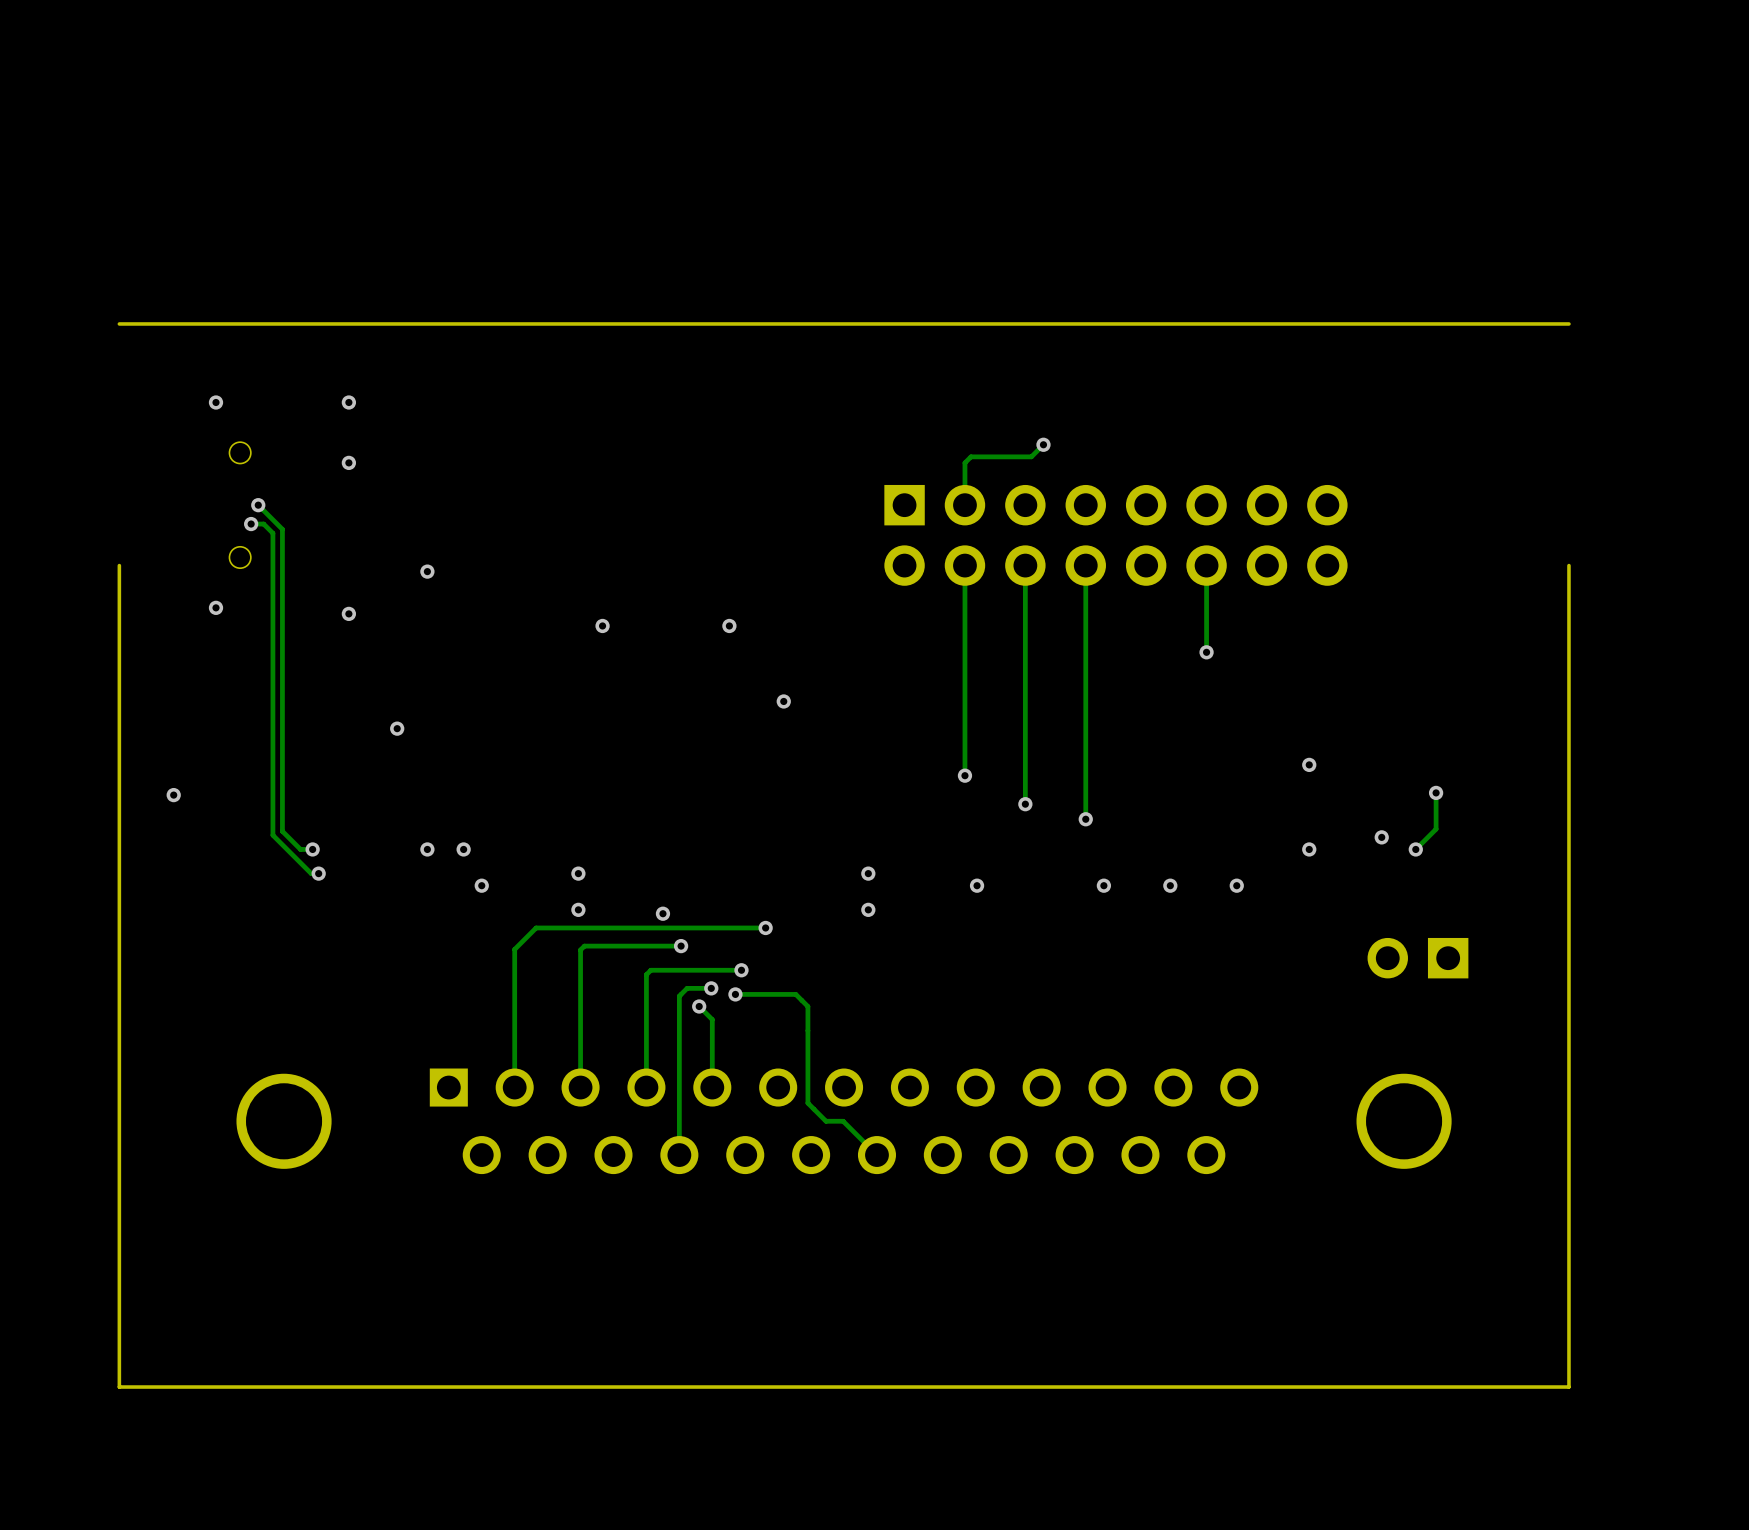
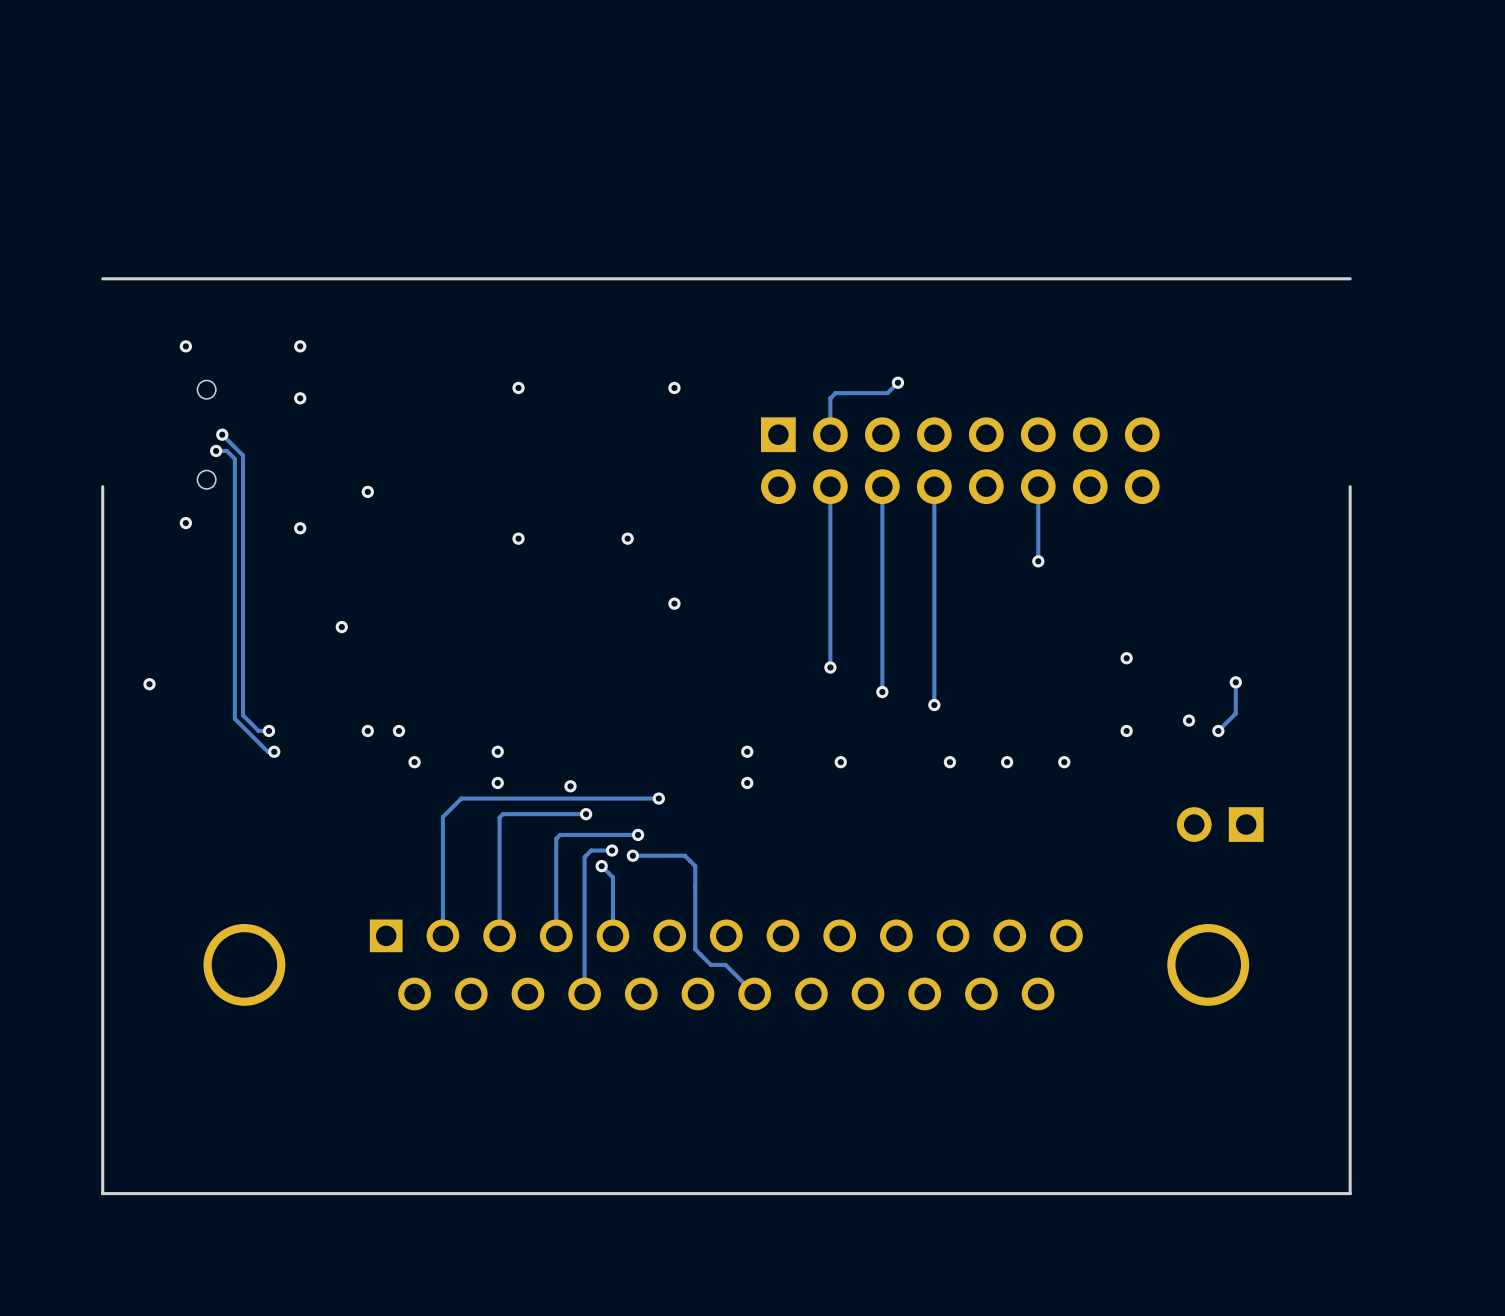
via: none -> (518, 387)
via: none -> (674, 387)

